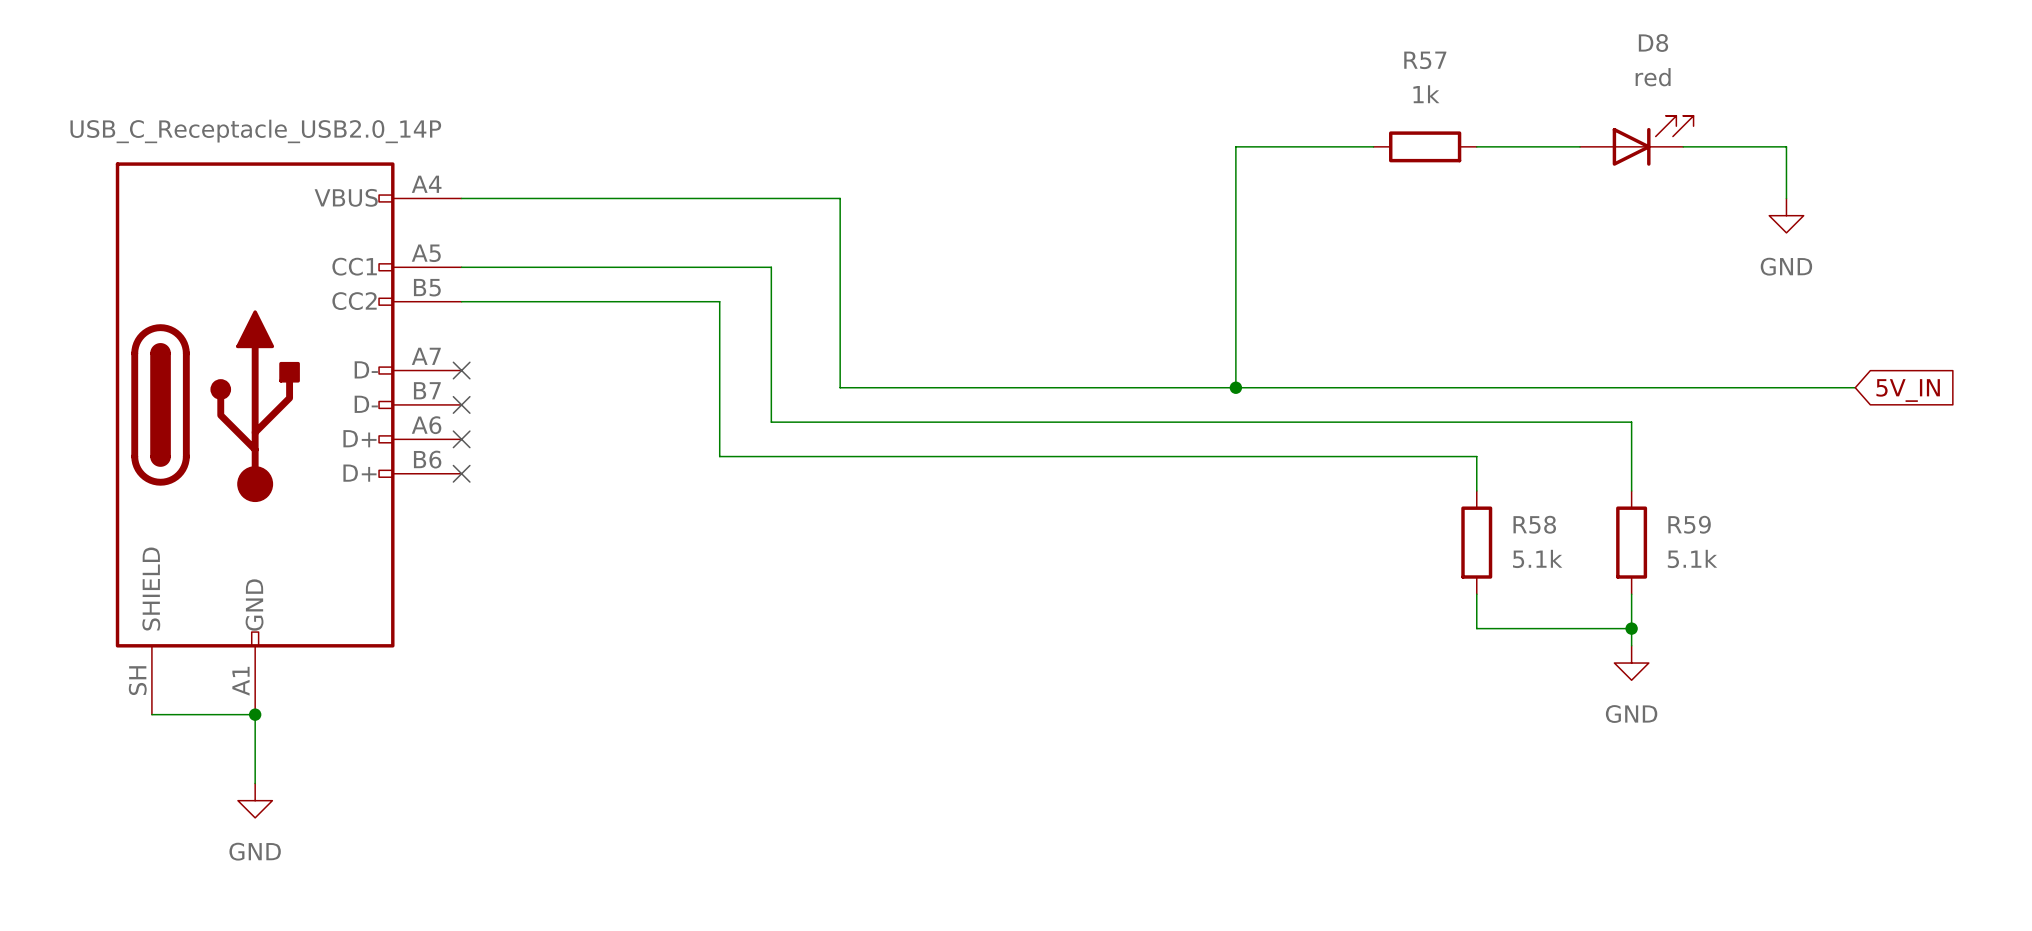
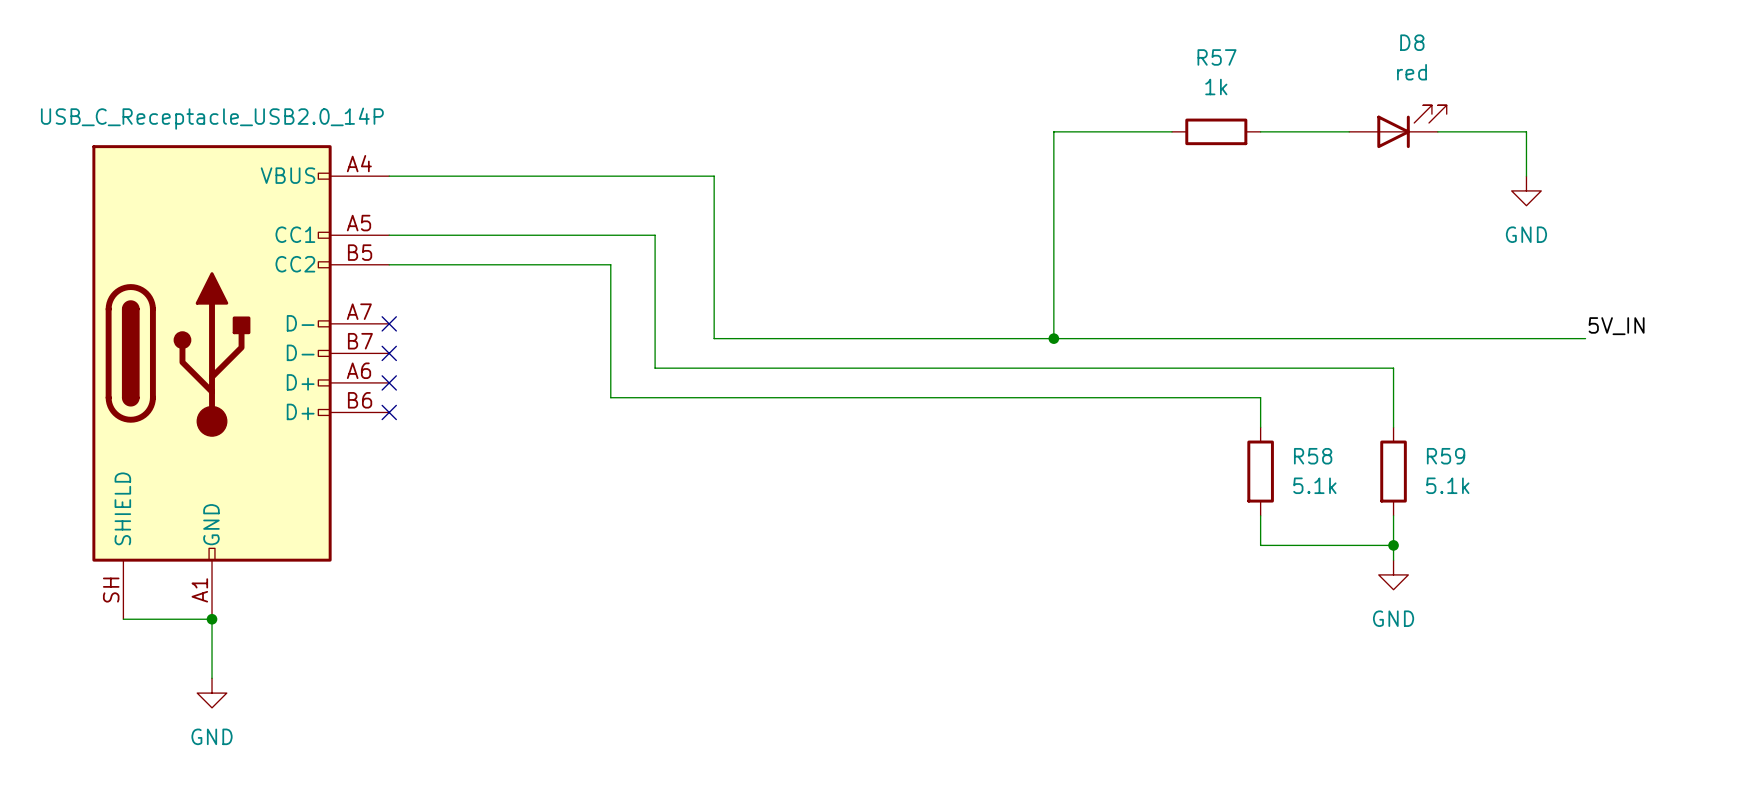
label: none -> 5V_IN (1616, 326)
global label: 5V_IN (1908, 390) -> none

